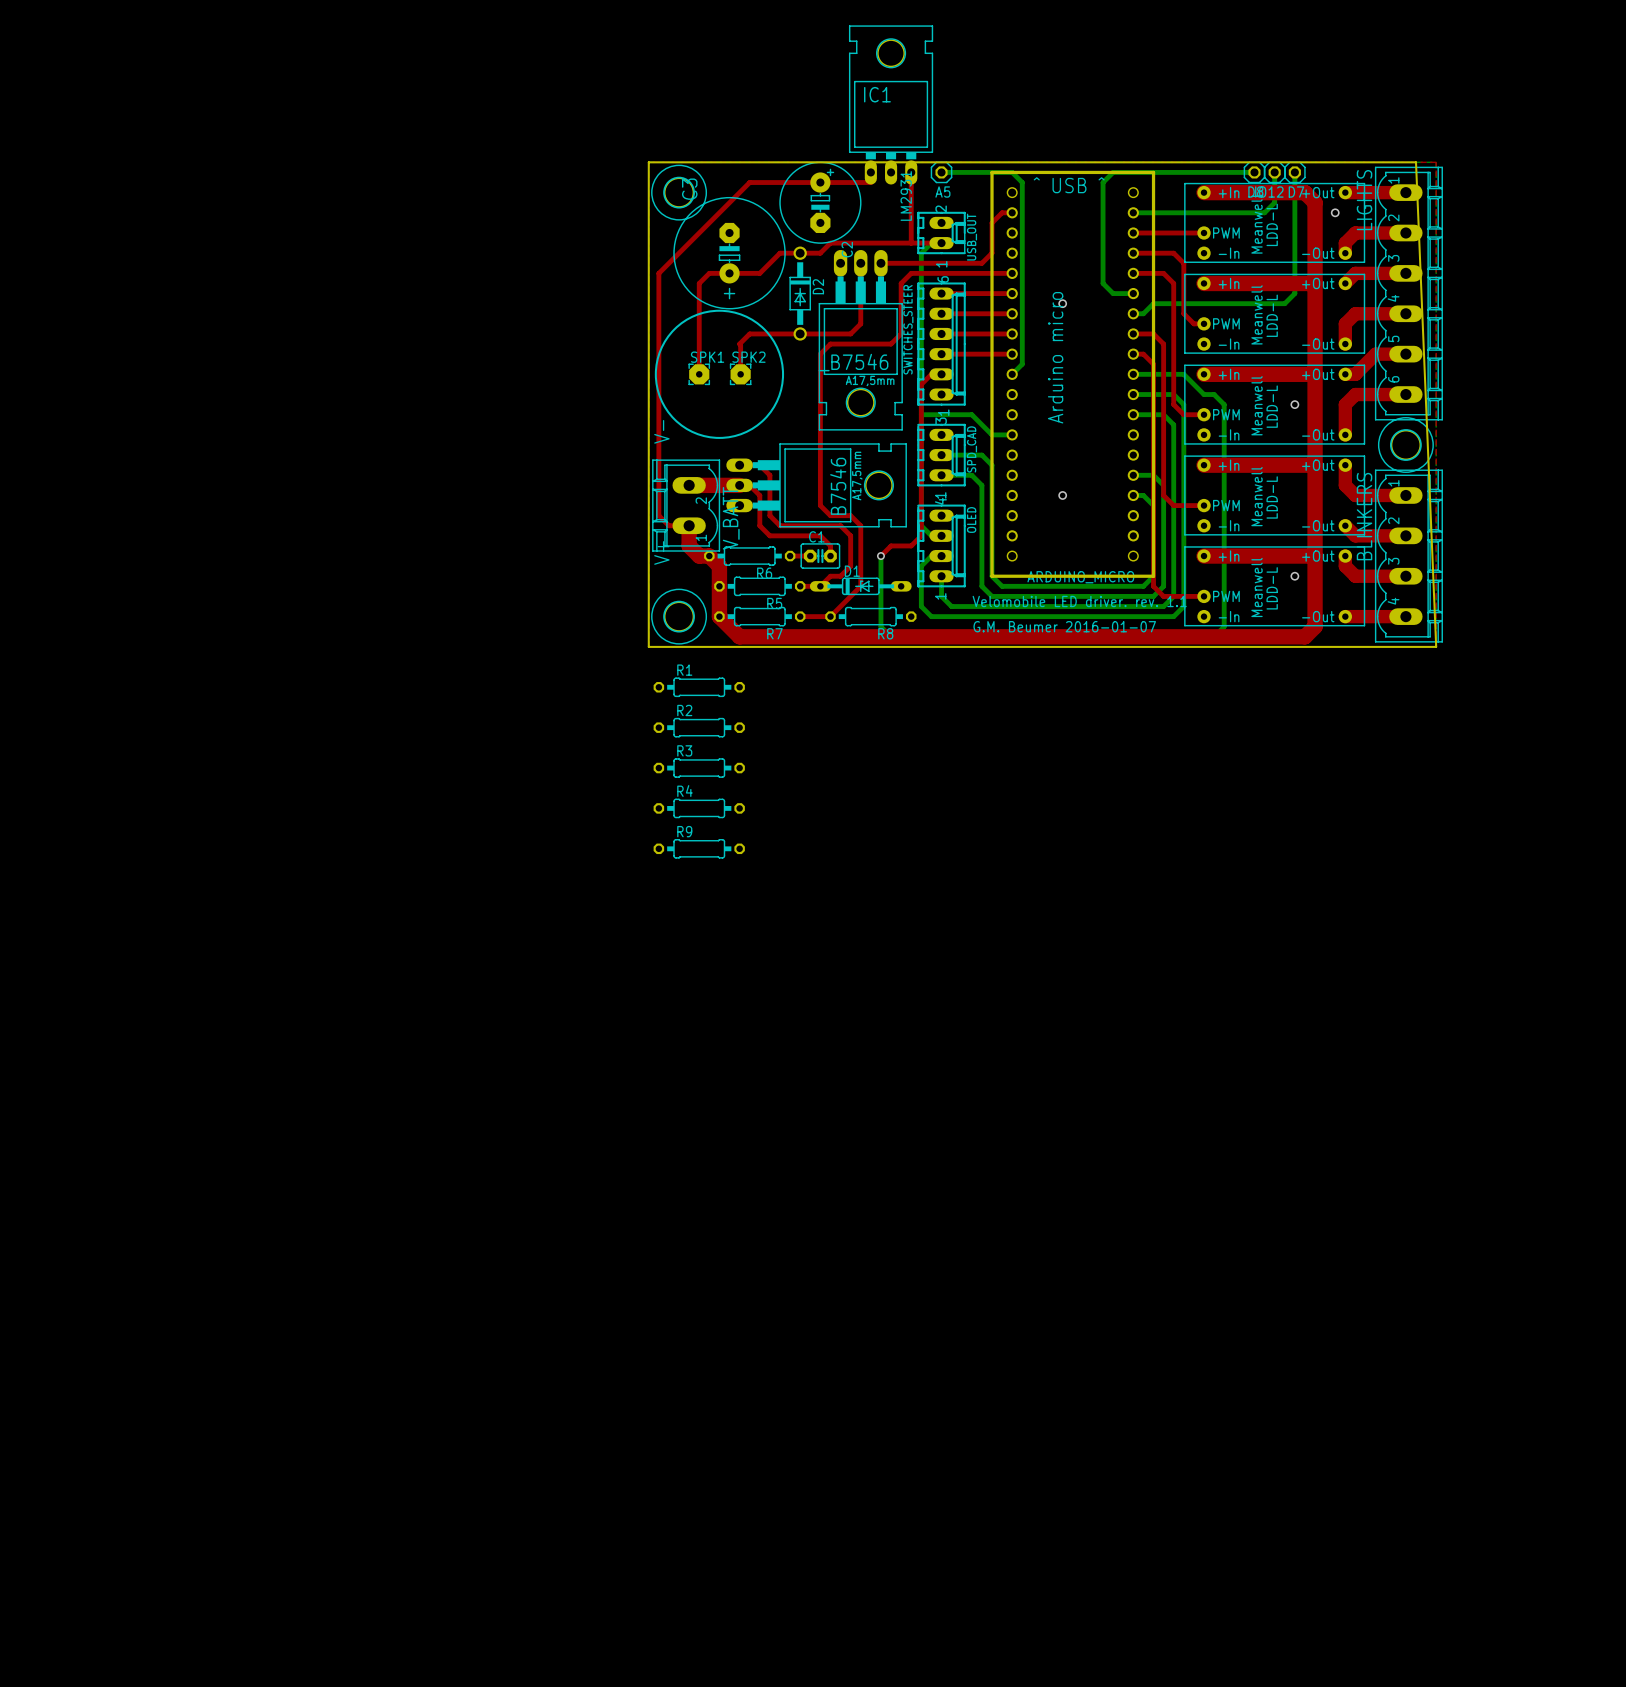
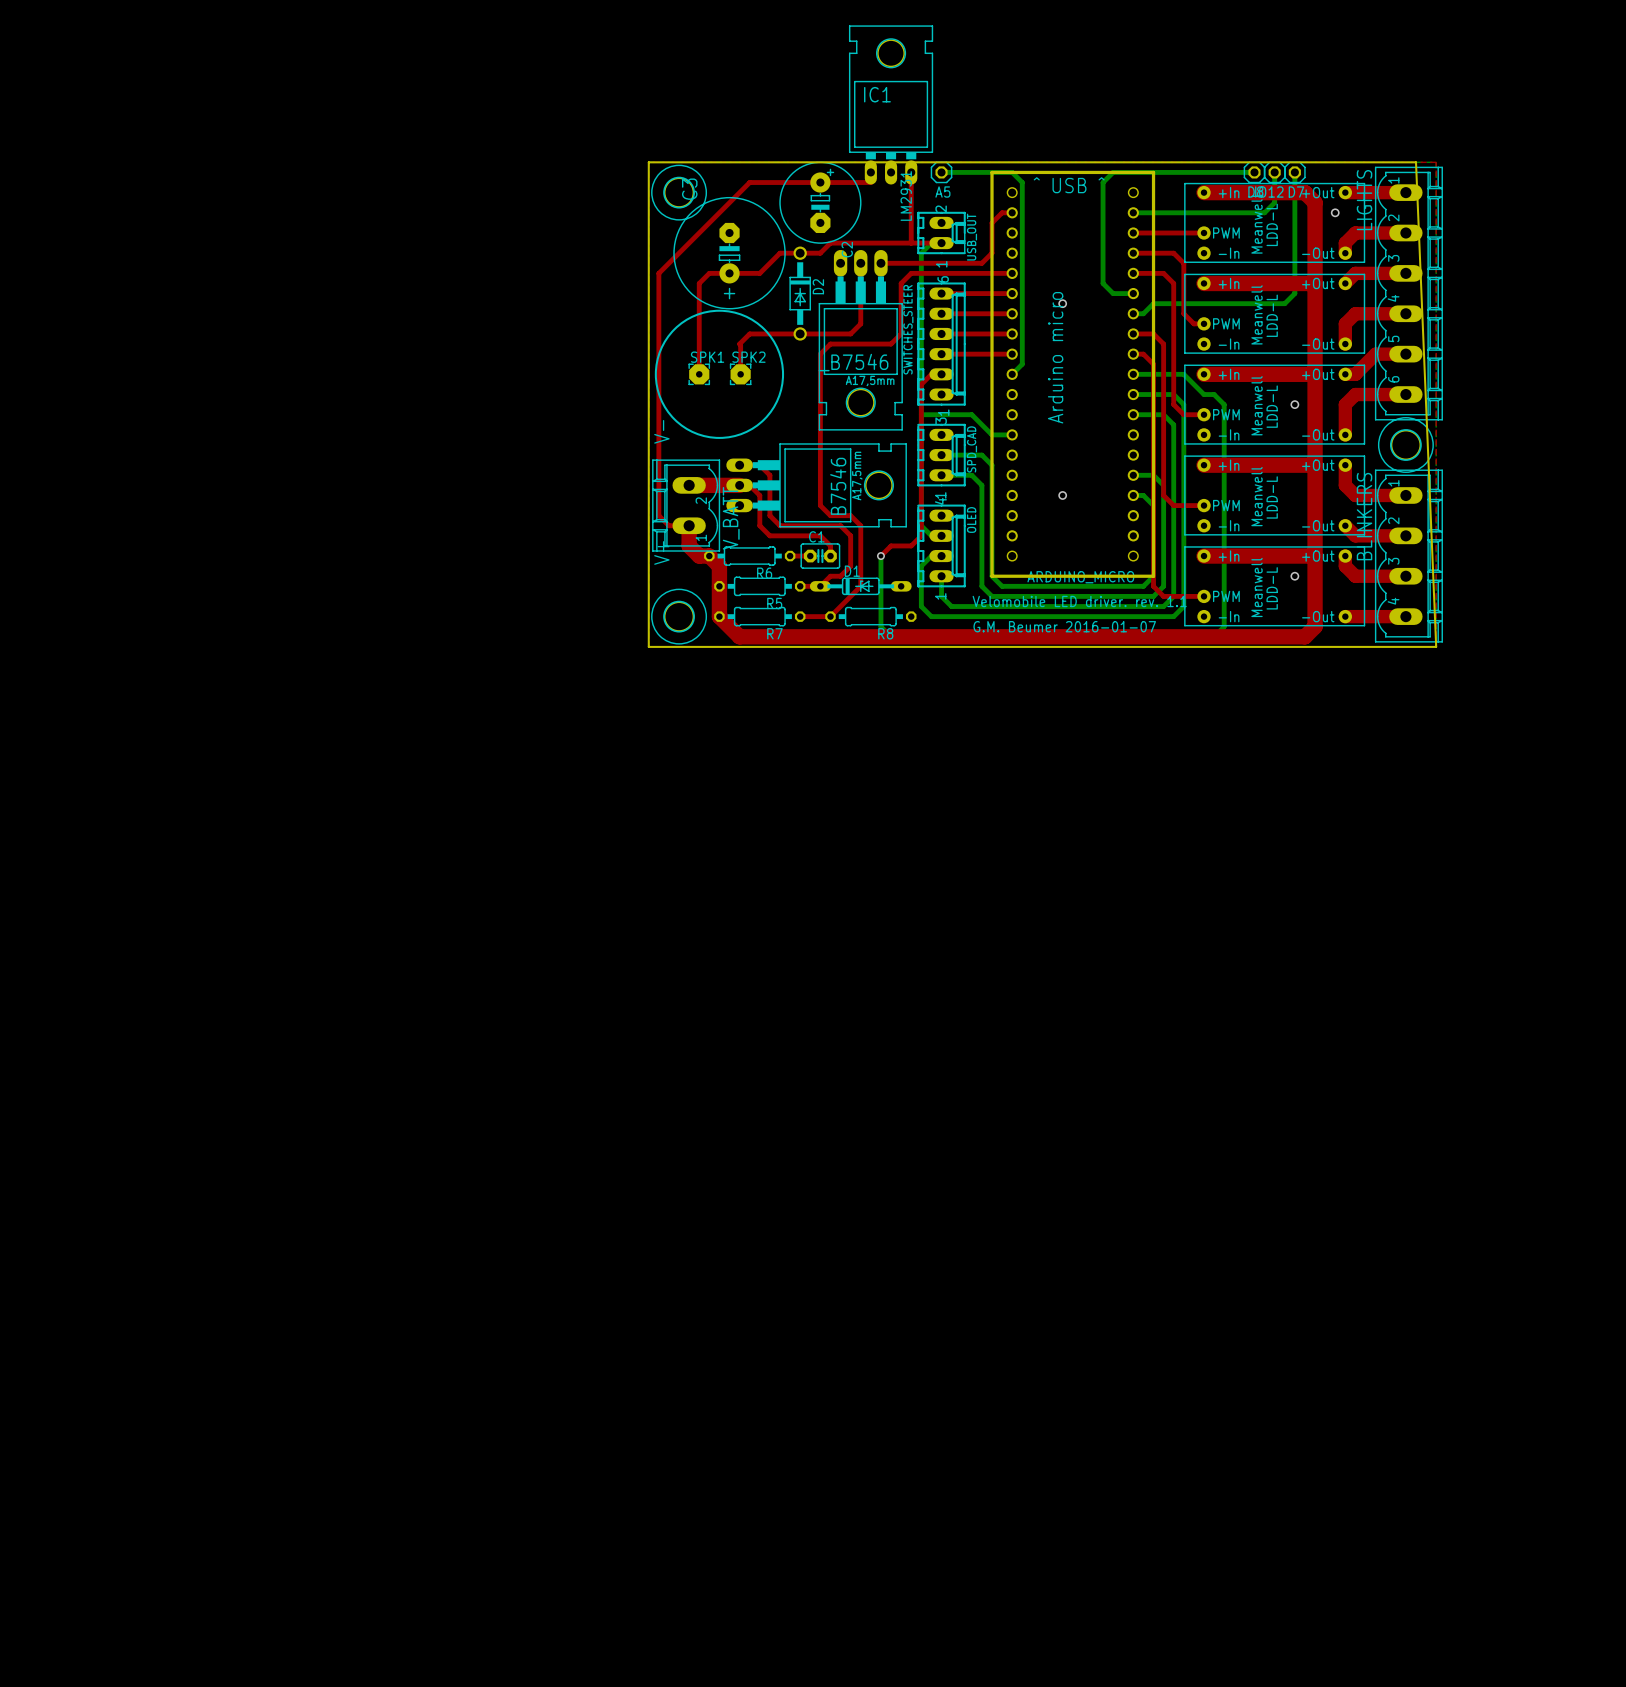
R1: (699, 687) -> none
R2: (699, 727) -> none
R3: (699, 768) -> none
R4: (699, 808) -> none
R9: (699, 848) -> none

